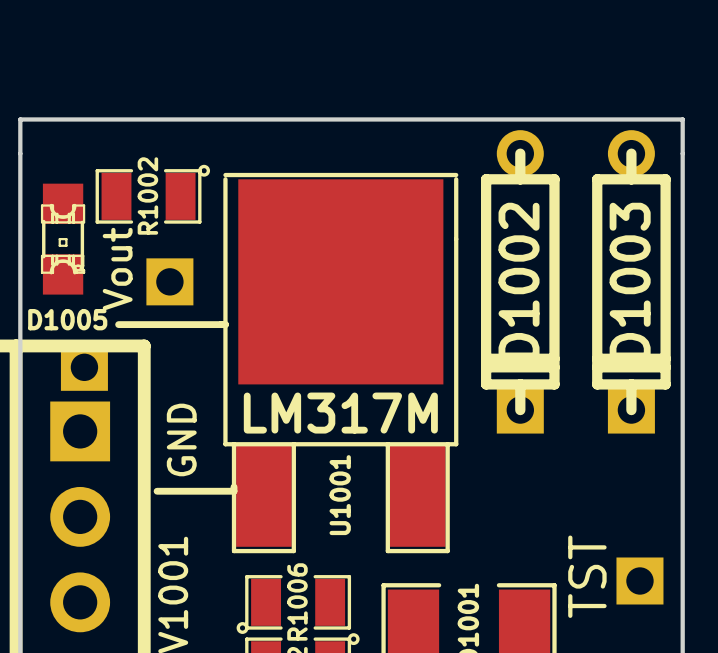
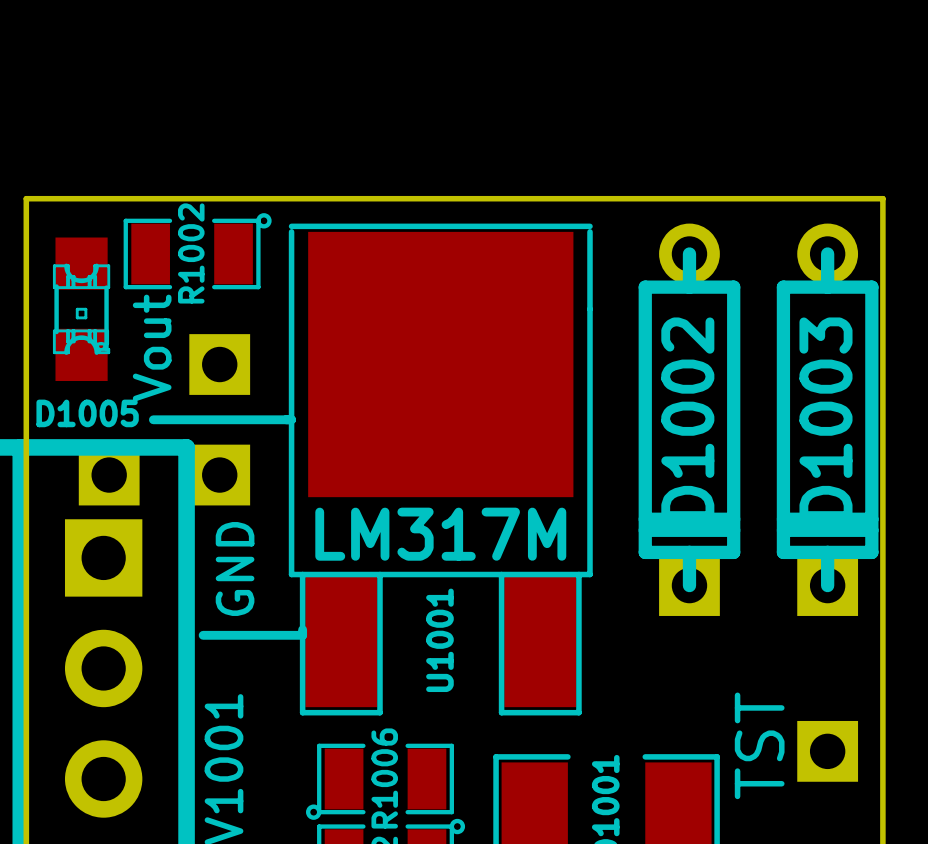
board edge: (20, 153) (20, 119) (682, 119) (682, 153) -> (26, 198) (882, 198)
D1002 position: (520, 281) -> (689, 419)
D1003 position: (631, 281) -> (827, 419)
part: none -> (219, 475)

